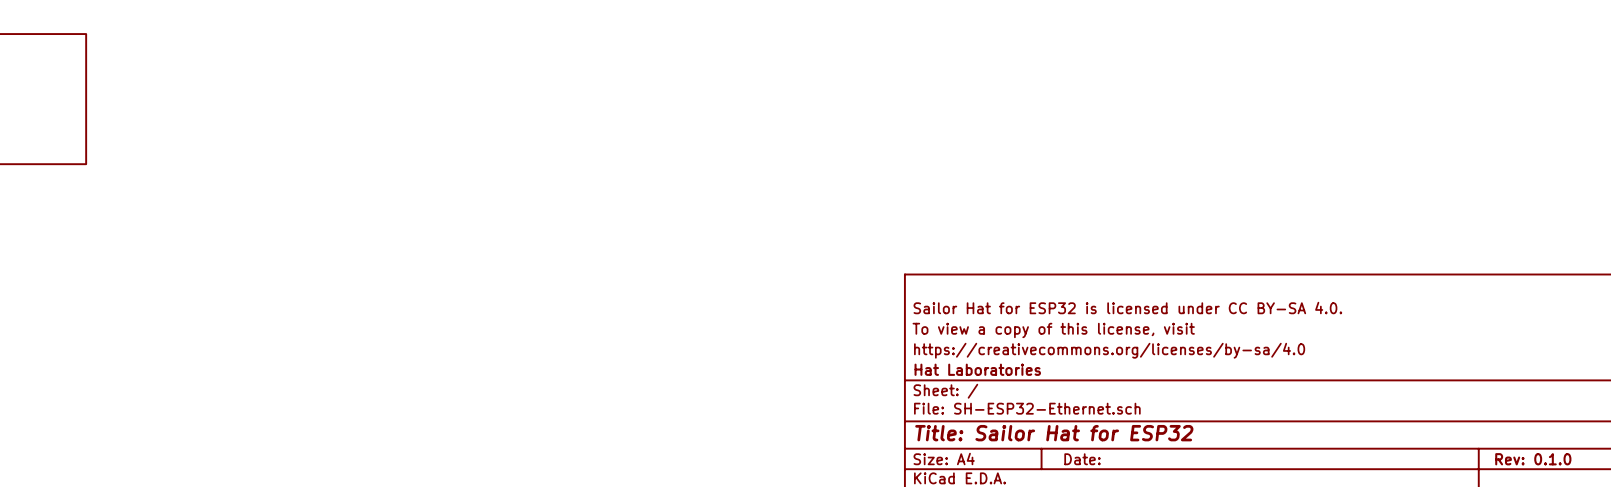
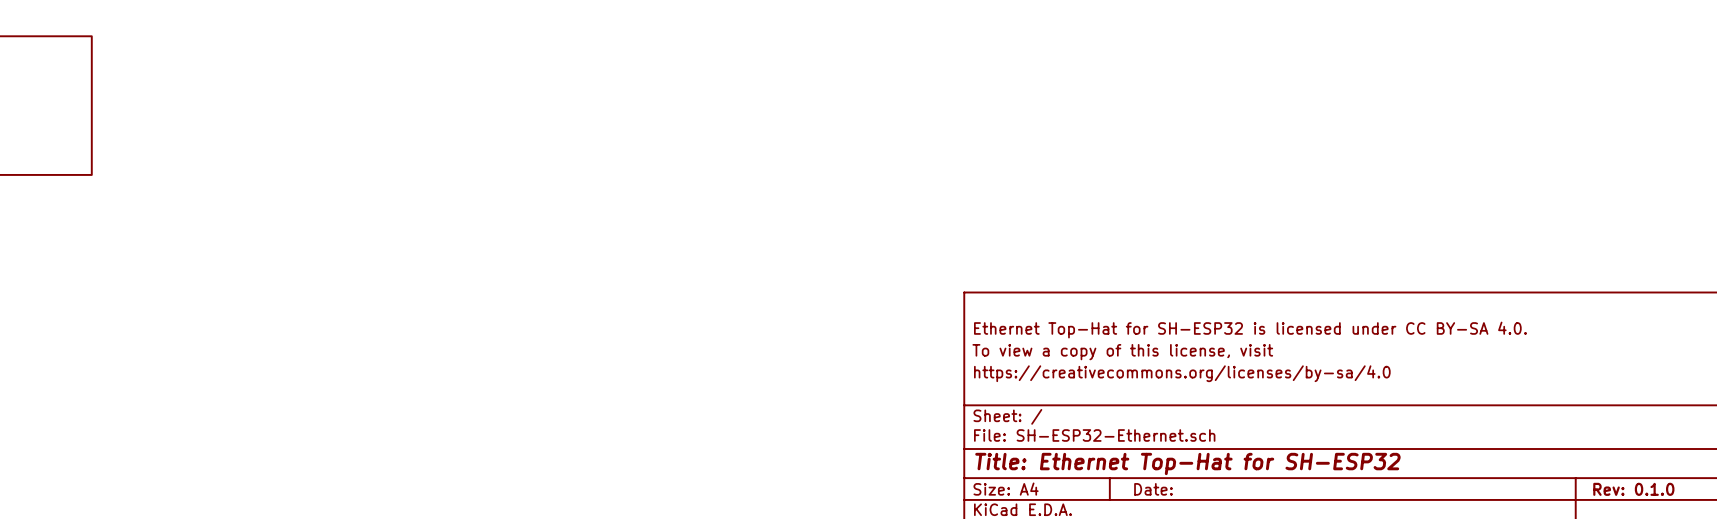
title block: Sailor Hat for ESP32 is licensed under CC BY-SA 4.0. (1127, 308) -> Ethernet Top-Hat for SH-ESP32 is licensed under CC BY-SA 4.0. (1250, 330)
title block: Hat Laboratories (977, 369) -> none
title block: Title: Sailor Hat for ESP32 (1054, 433) -> Title: Ethernet Top-Hat for SH-ESP32 (1187, 463)

